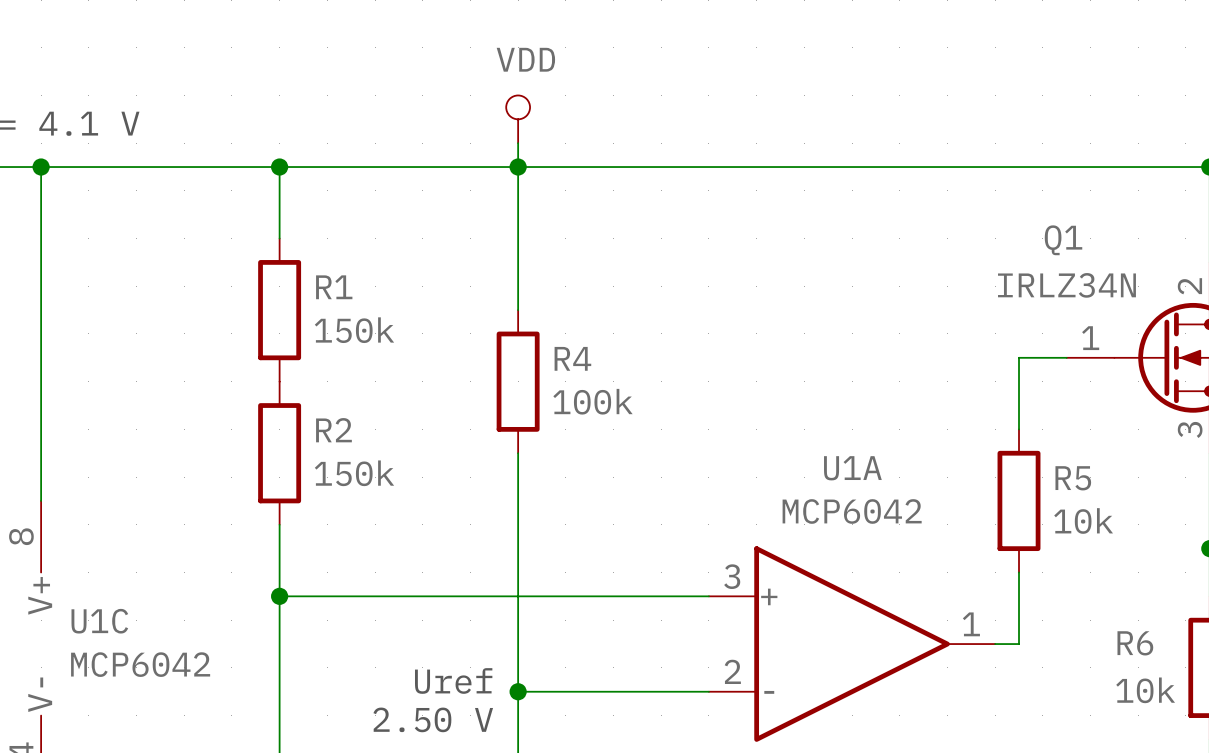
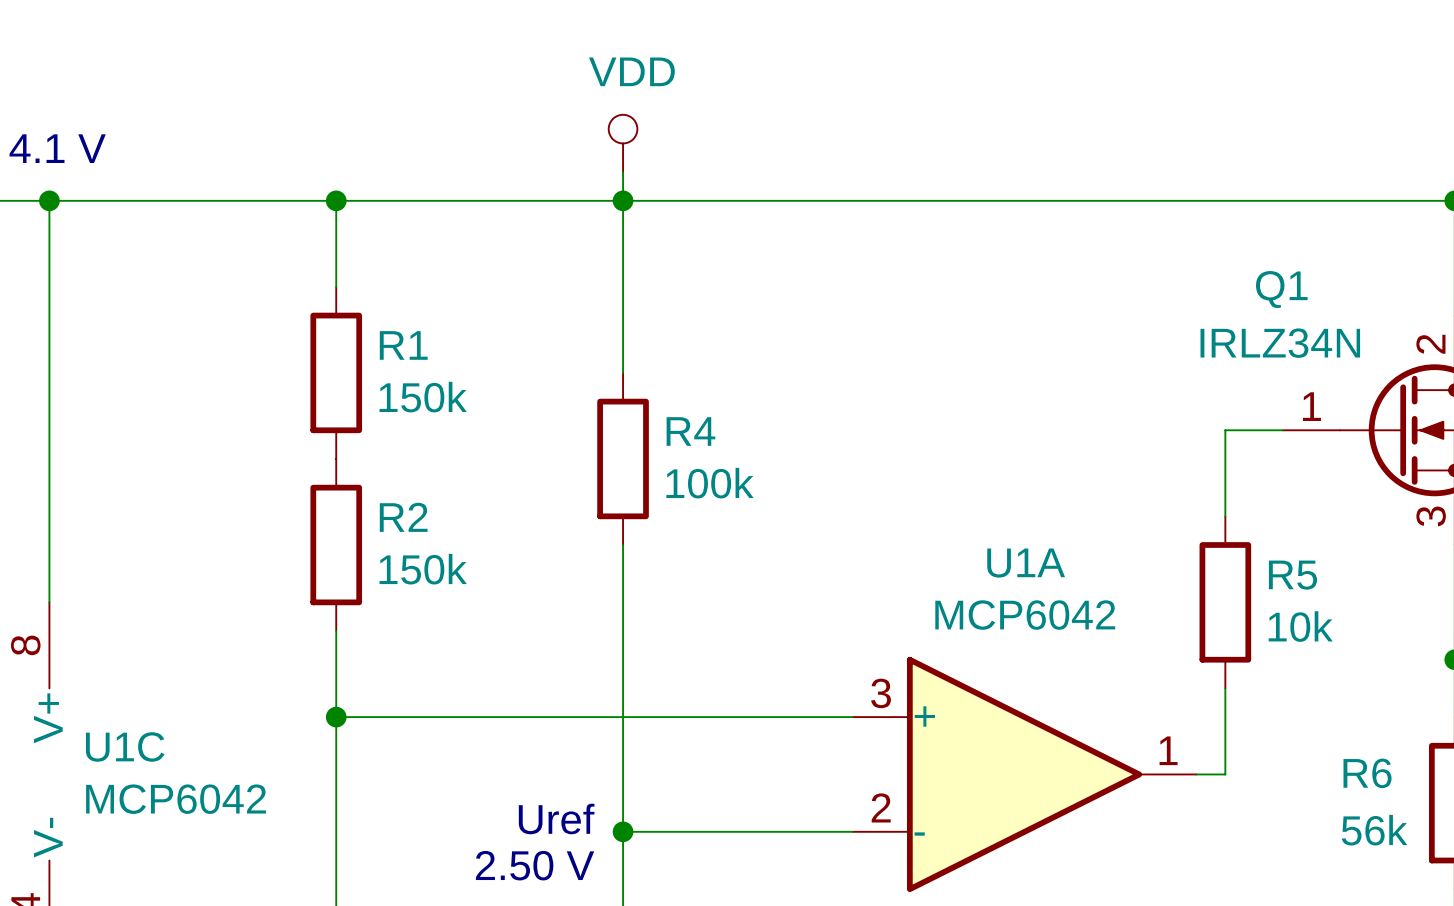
R6 value: 10k (1145, 690) -> 56k (1374, 830)

